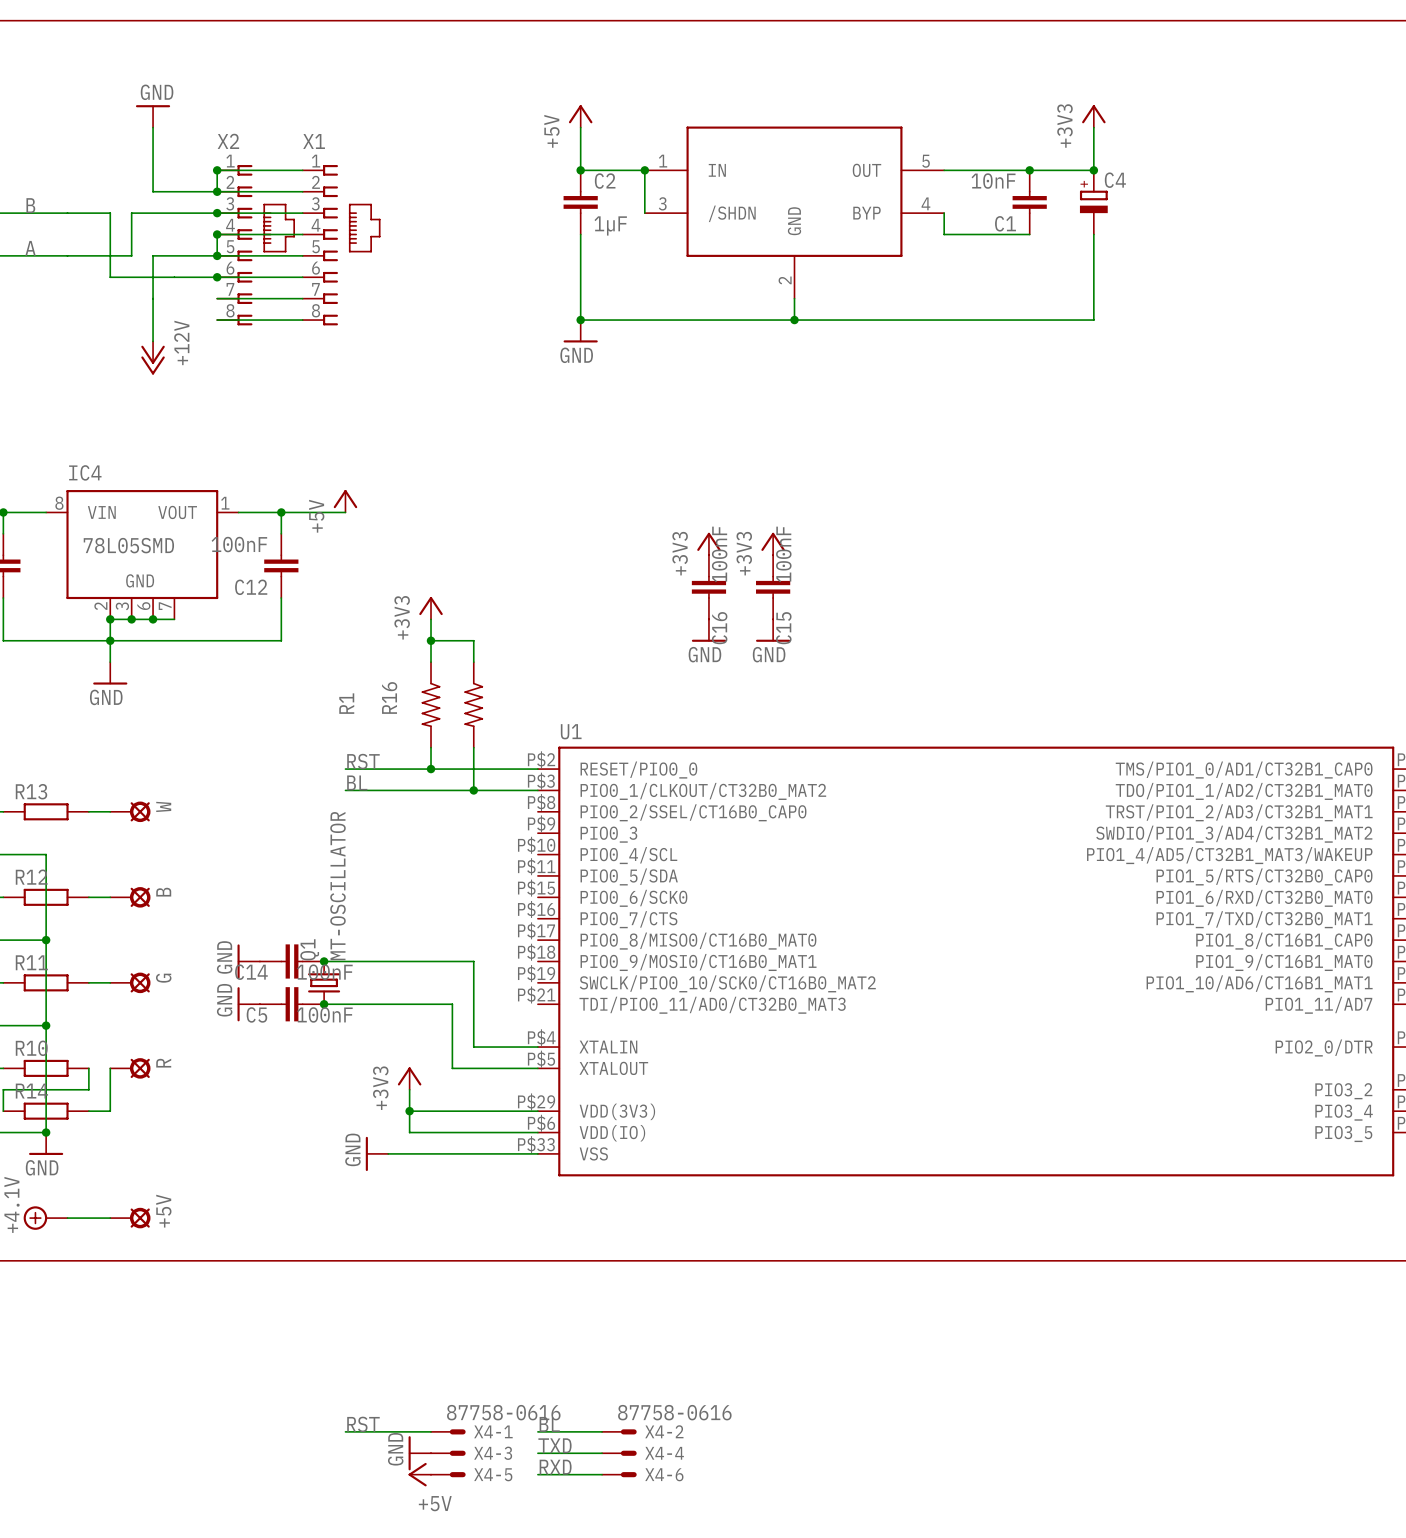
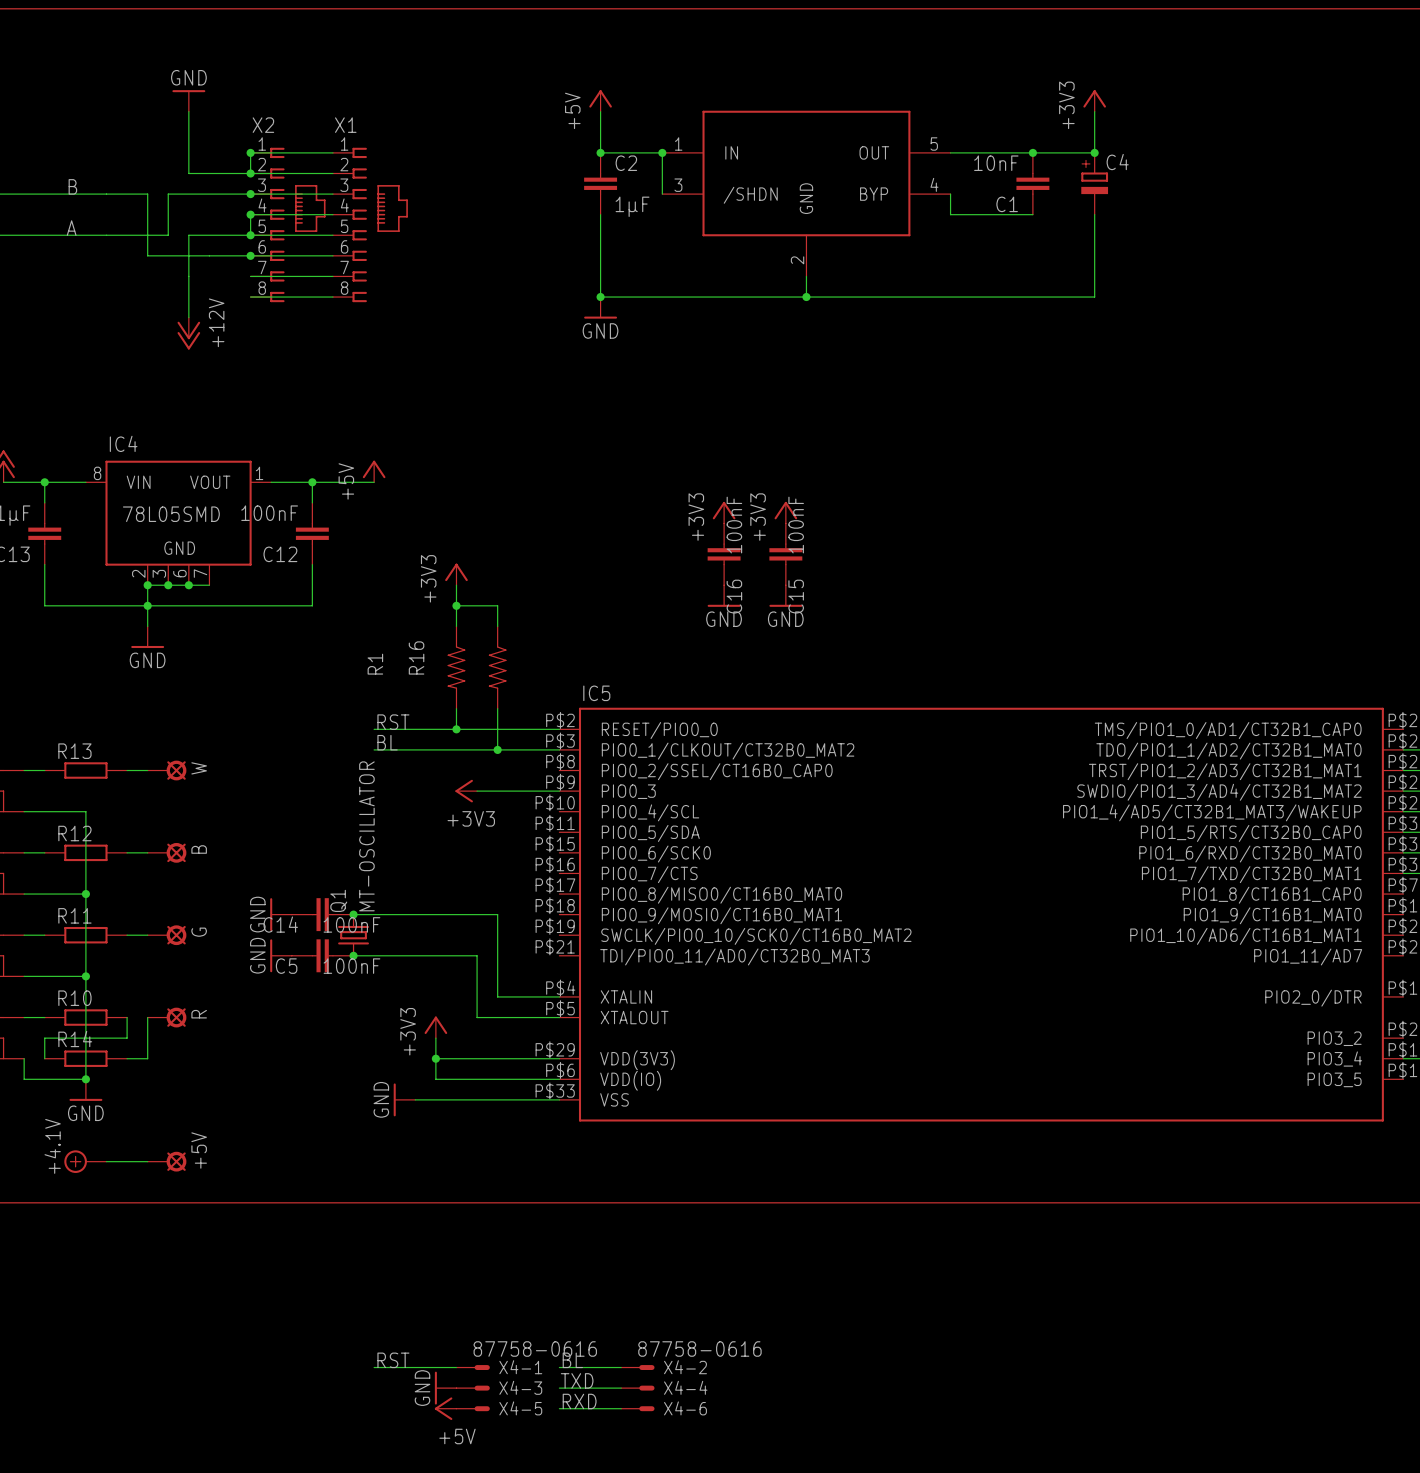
U1 name: U1 (571, 731) -> IC5 (596, 693)
power symbol: none -> +3V3 (466, 791)
wire: none -> (477, 791) (559, 791)

